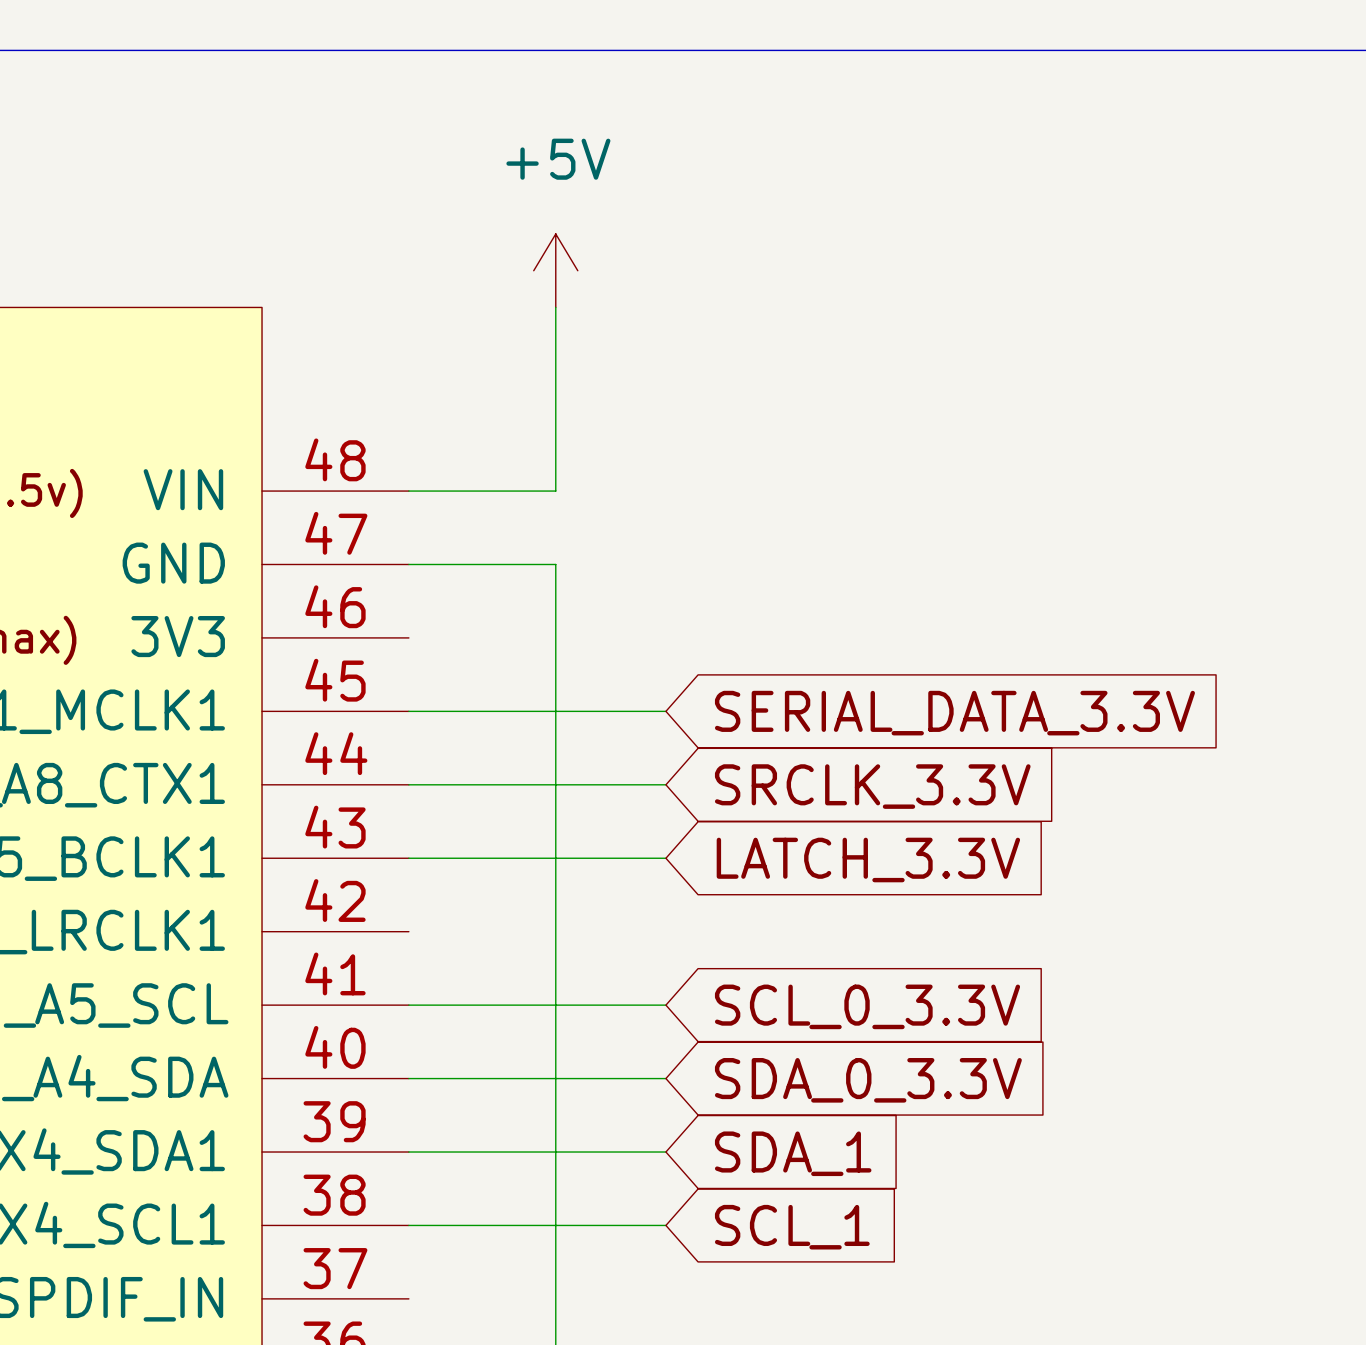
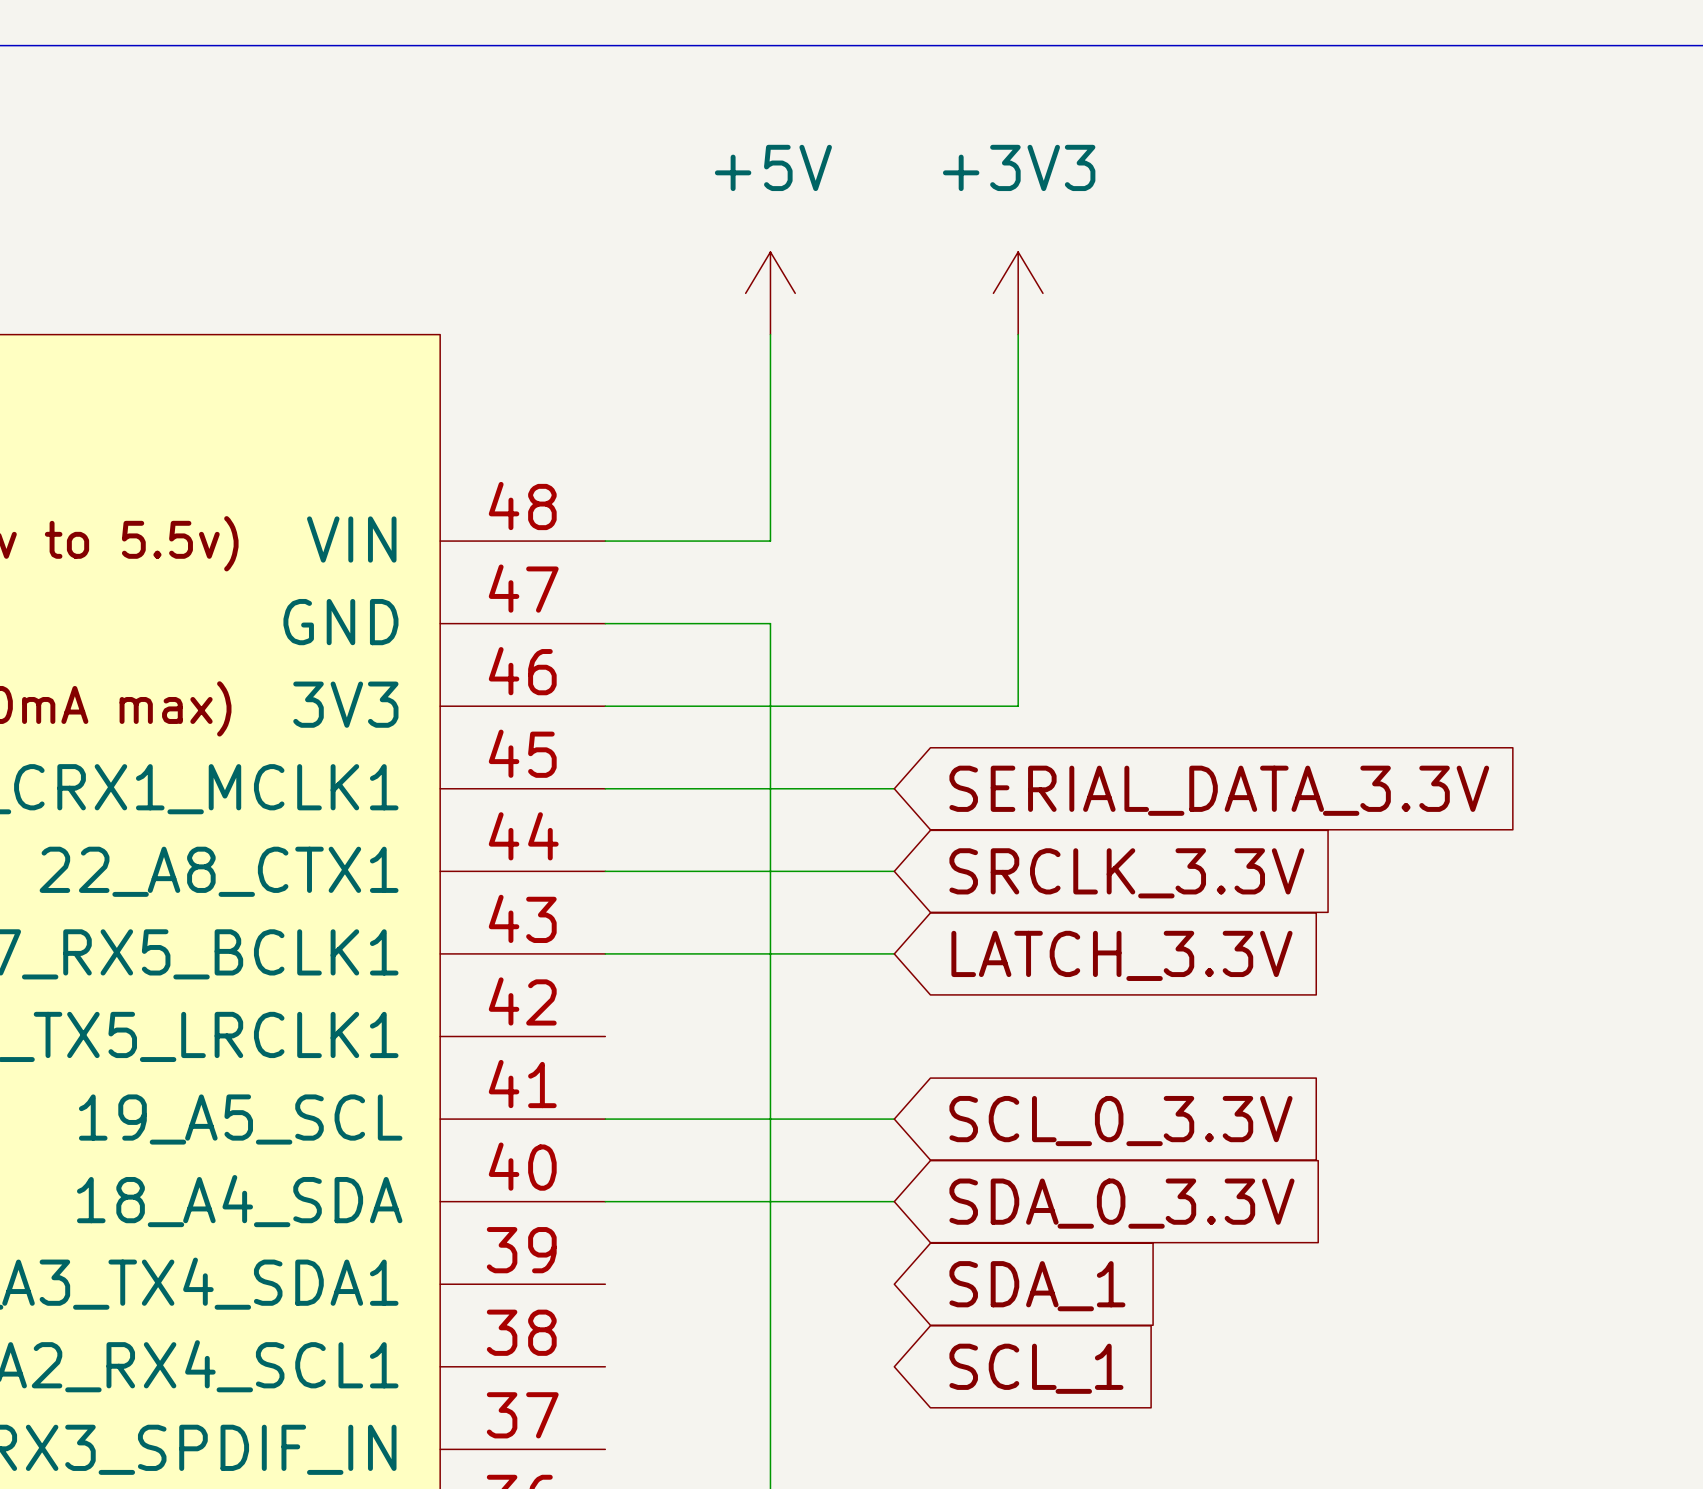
power symbol: none -> +3V3 (1018, 293)
wire: none -> (1018, 334) (1018, 706) (605, 706)
wire: (408, 1152) (665, 1152) -> none
wire: (408, 1225) (665, 1225) -> none

